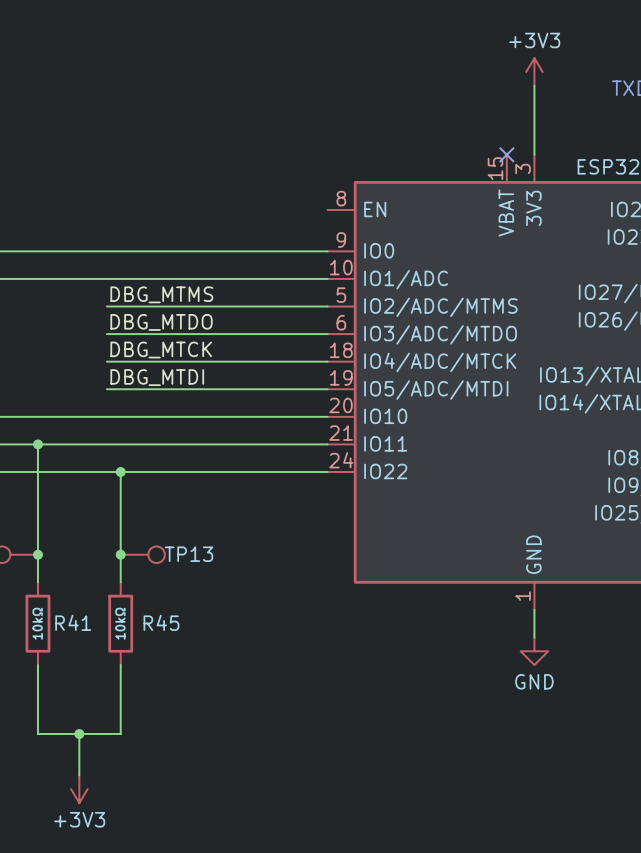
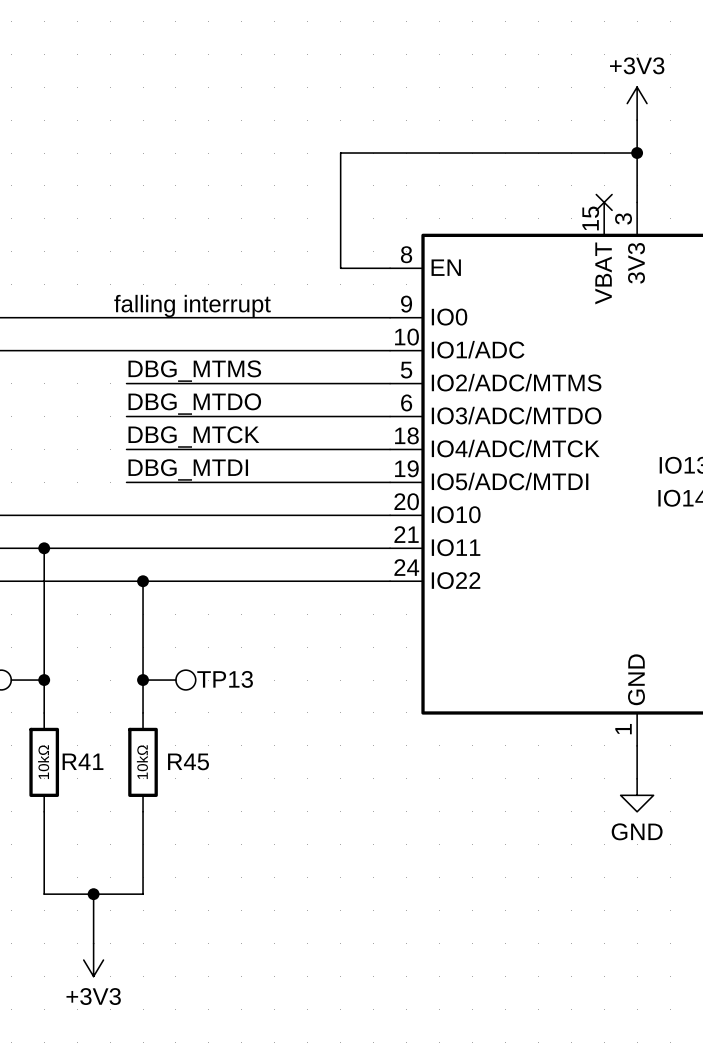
wire: none -> (637, 153) (340, 153) (340, 268) (390, 268)
junction: none -> (637, 153)
text: none -> falling interrupt (192, 306)

